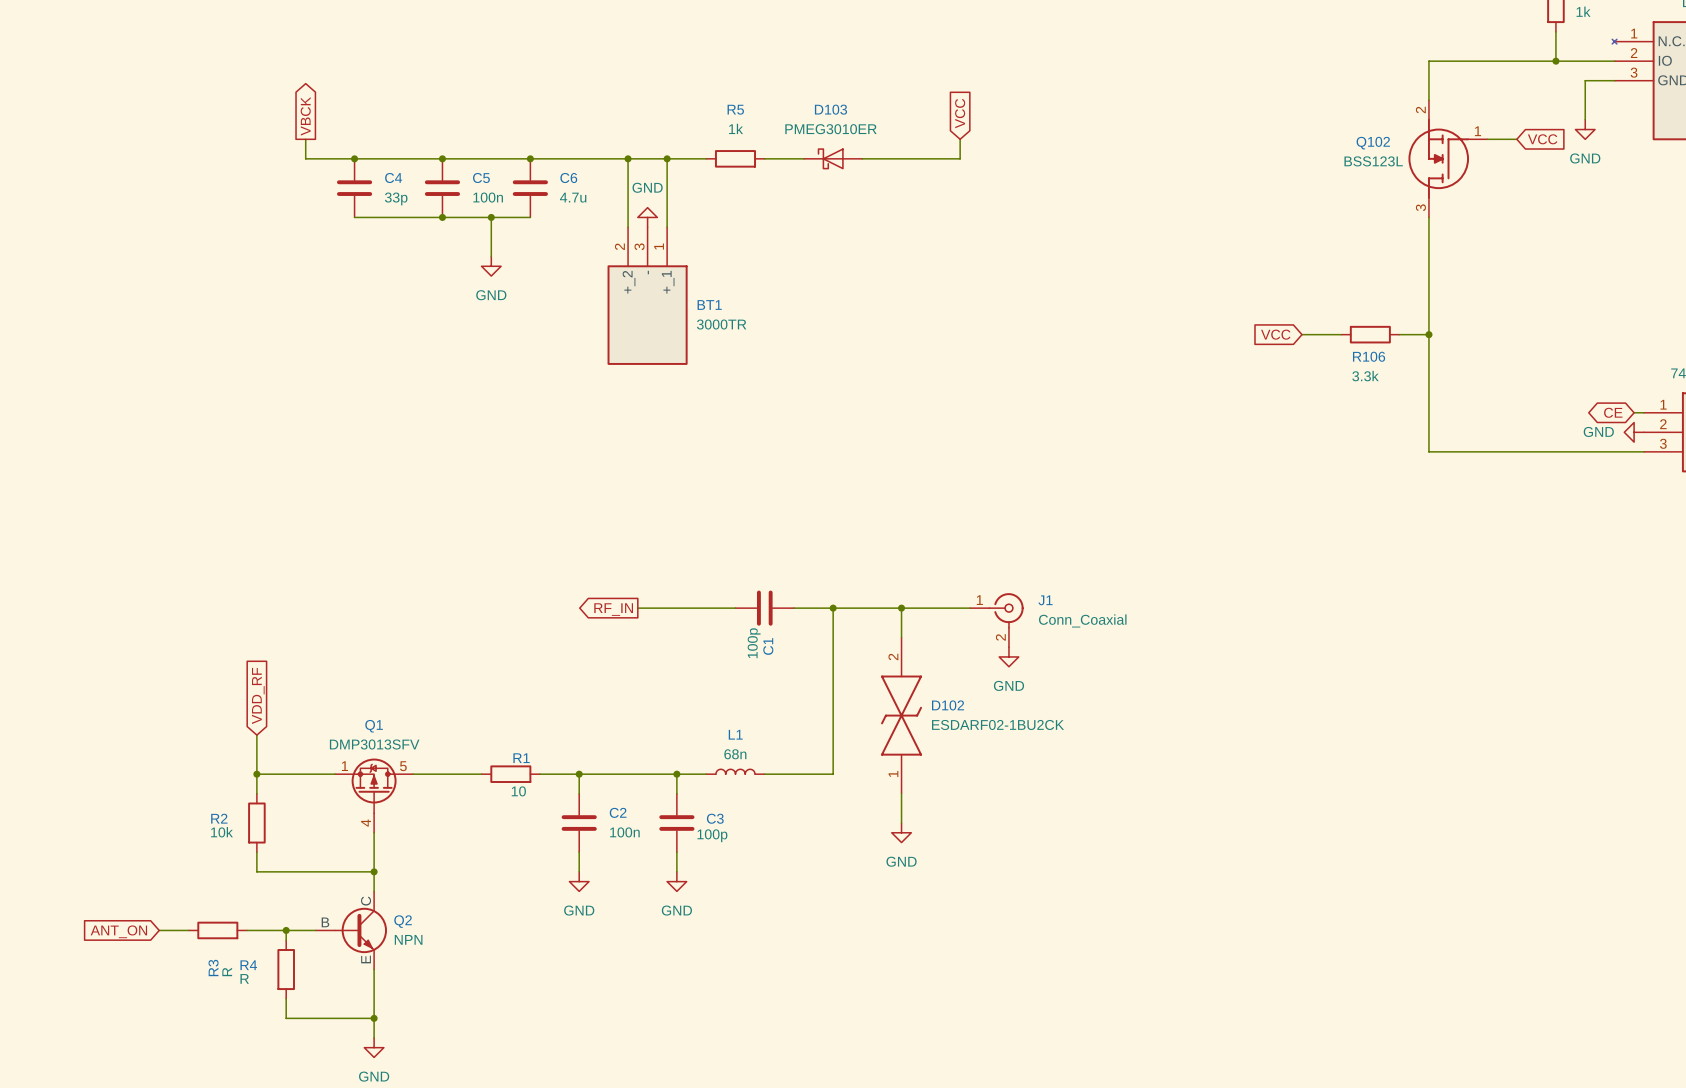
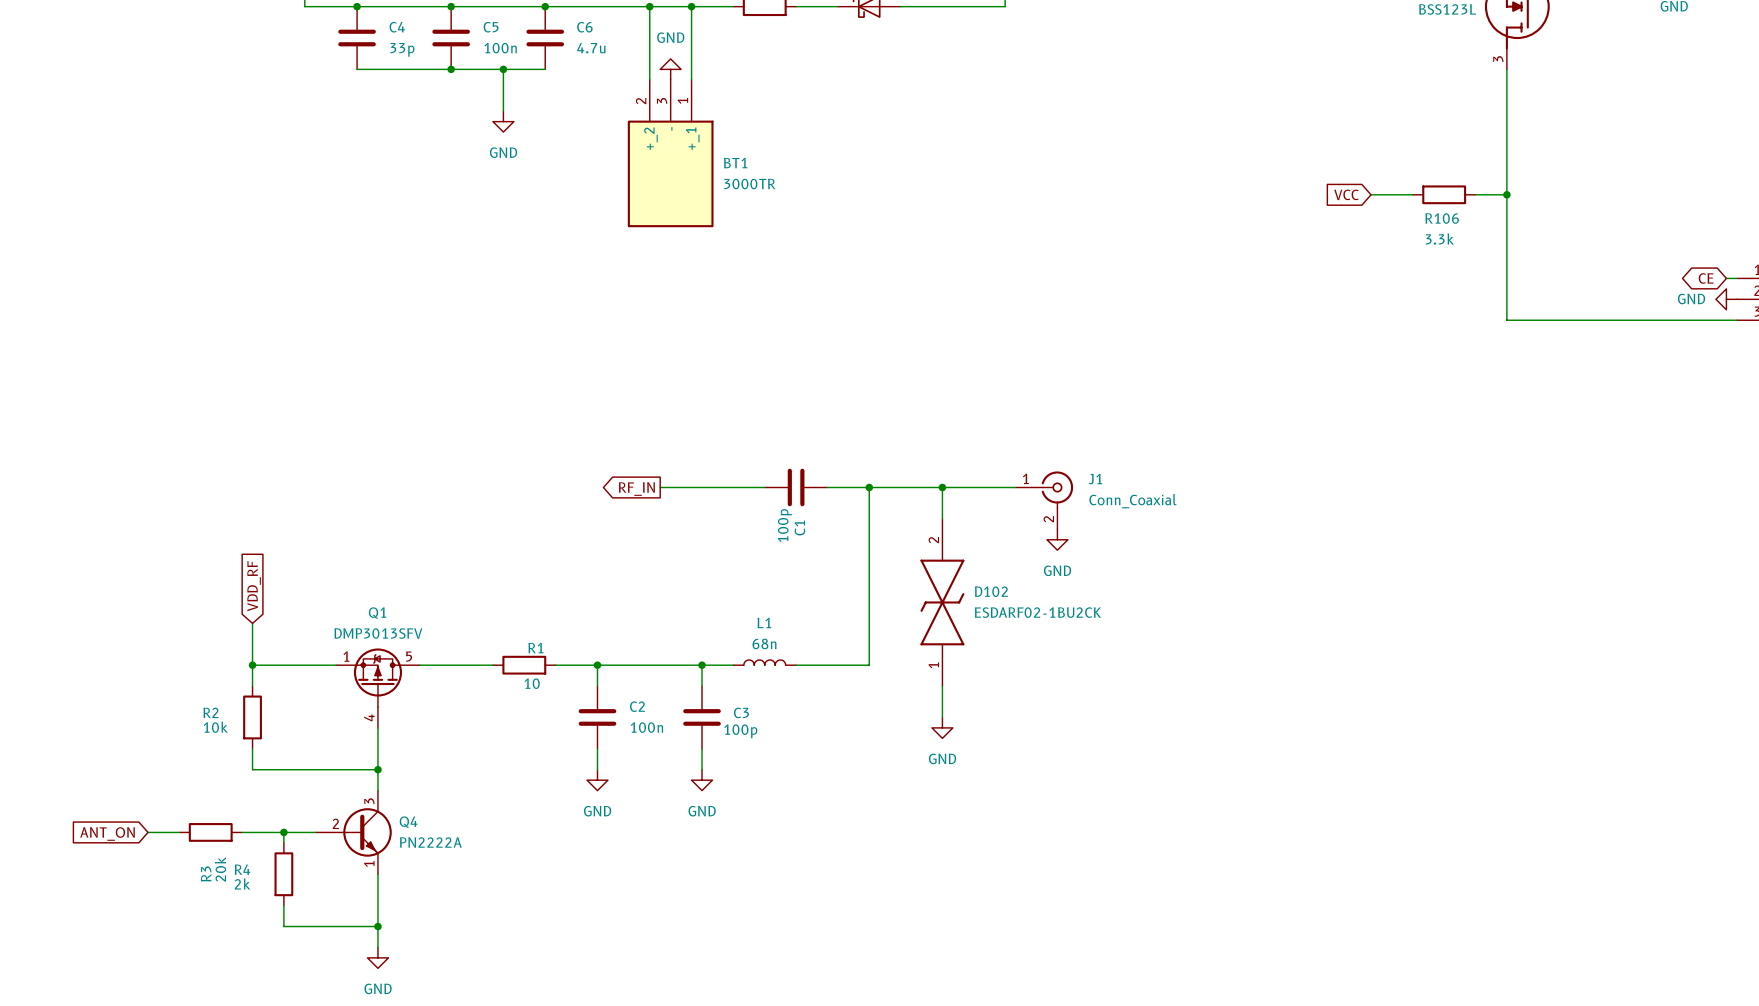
Q2: NPN (351, 930) -> none
Q4: none -> PN2222A (353, 832)
R3 value: R (227, 971) -> 20k (220, 869)
R4 value: R (244, 978) -> 2k (242, 883)

